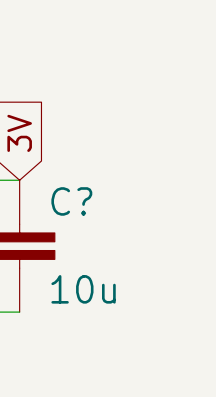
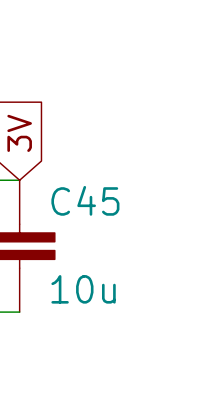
C? name: C? (71, 201) -> C45 (85, 200)

